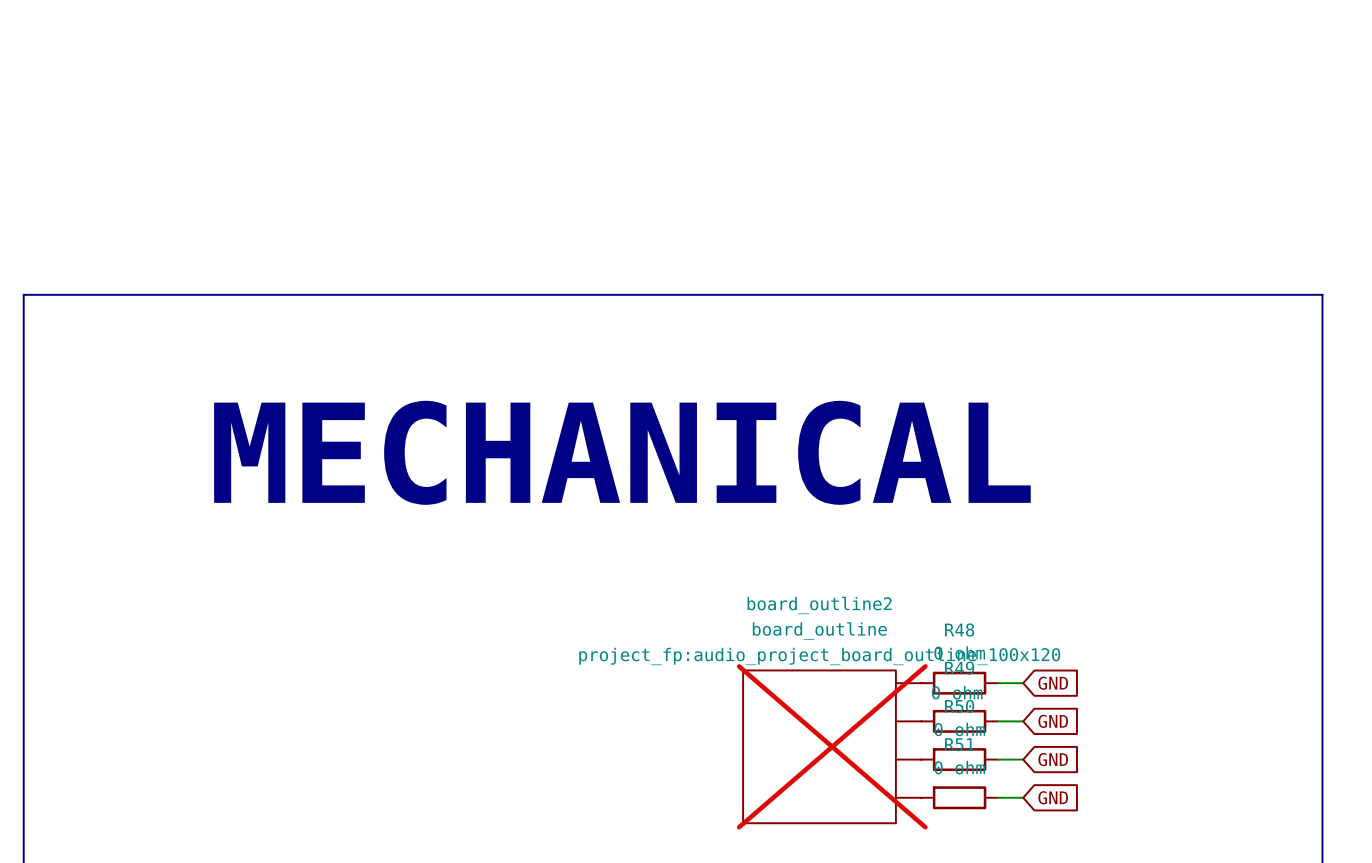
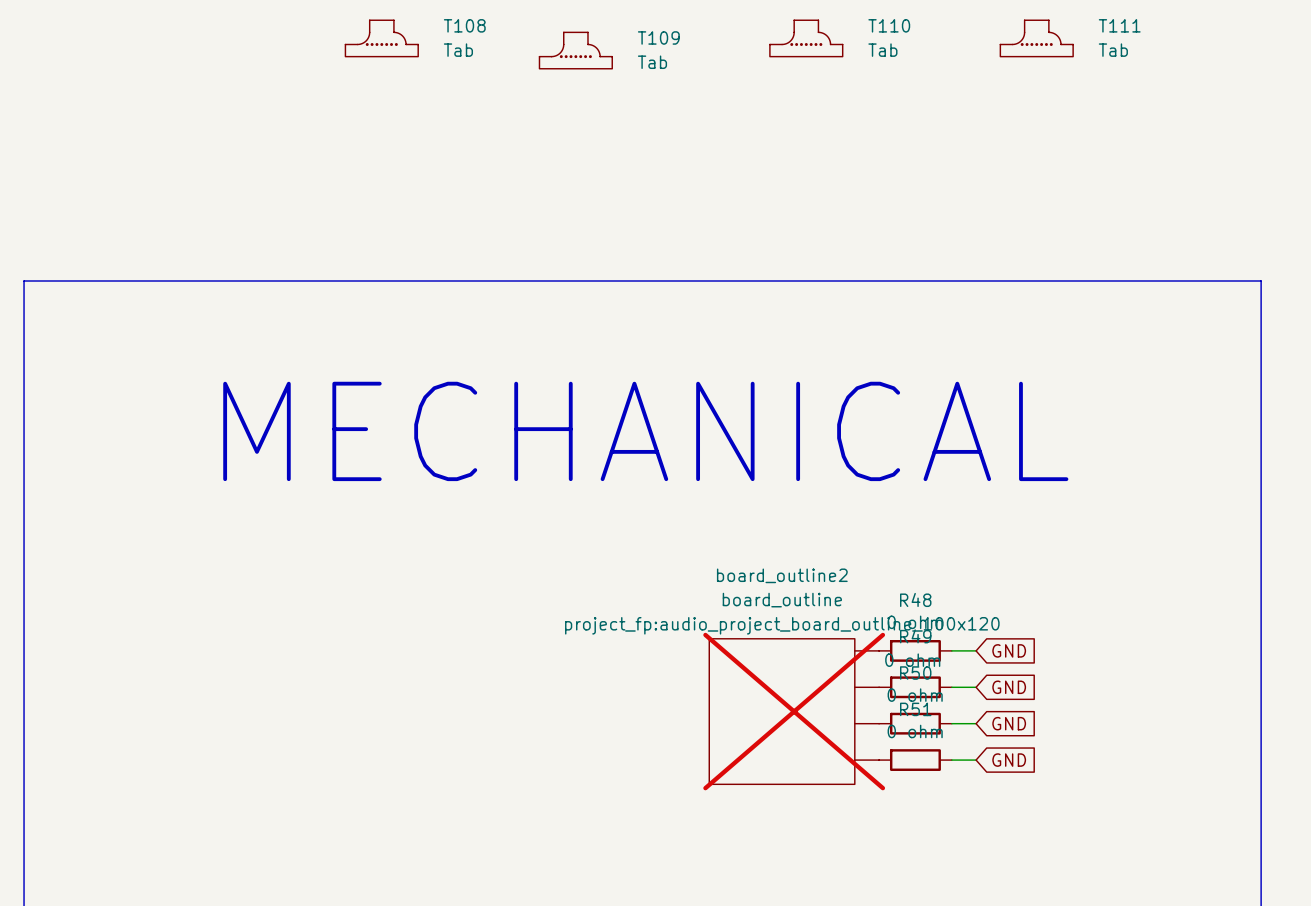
T108: none -> Tab (381, 38)
T110: none -> Tab (806, 38)
T111: none -> Tab (1036, 38)
T109: none -> Tab (575, 50)

